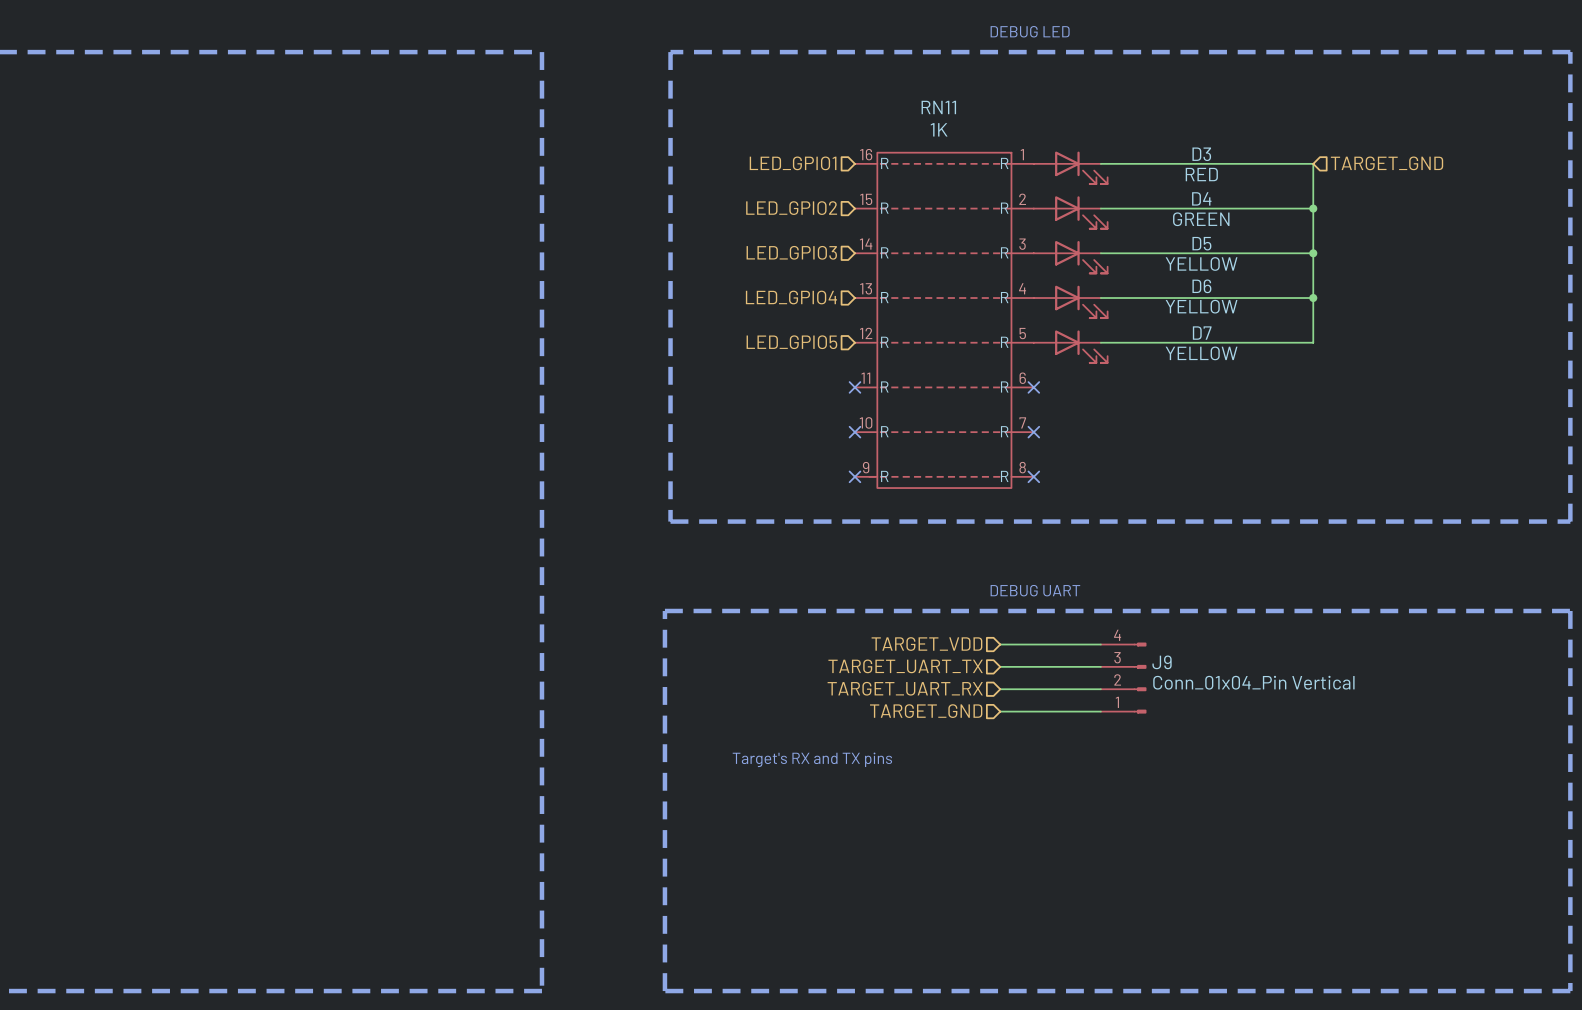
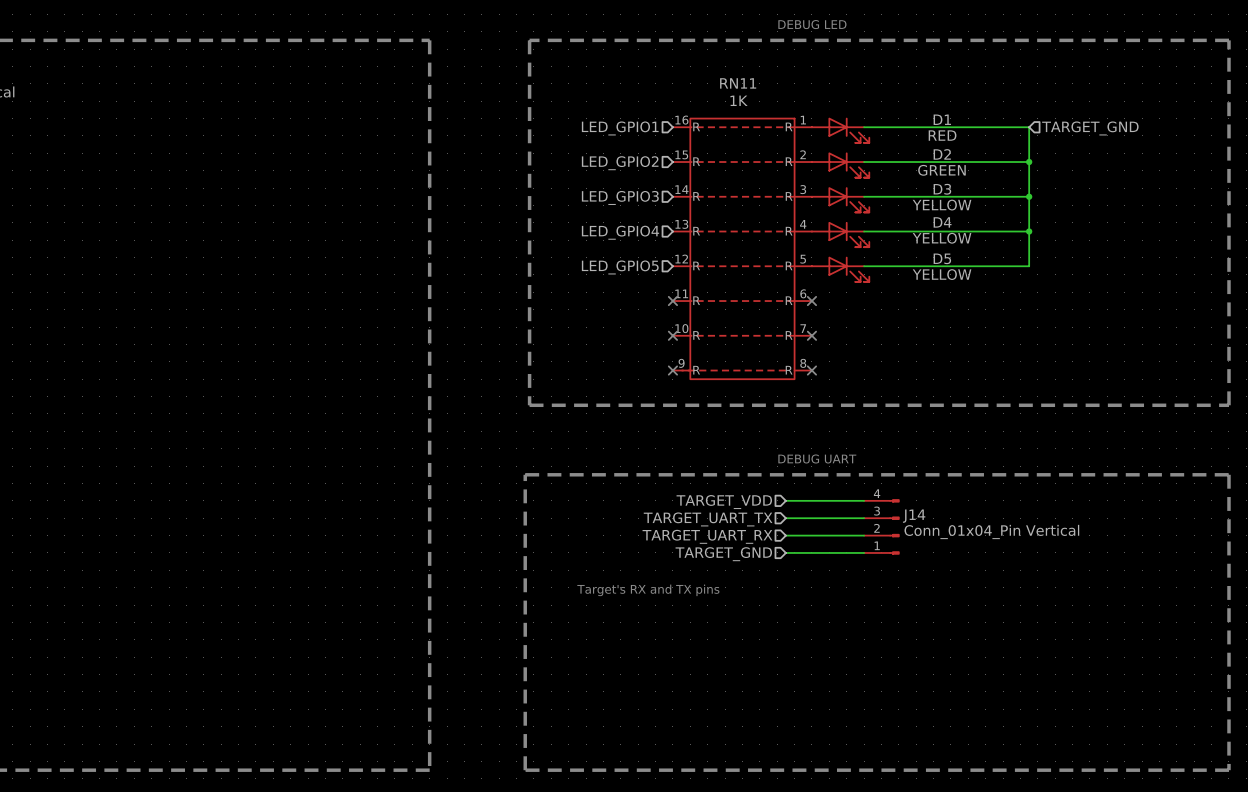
D3 name: D3 (1201, 154) -> D1 (942, 119)
D4 name: D4 (1201, 198) -> D2 (942, 154)
D5 name: D5 (1201, 243) -> D3 (942, 189)
D6 name: D6 (1201, 286) -> D4 (942, 222)
D7 name: D7 (1202, 333) -> D5 (942, 258)
J9 name: J9 (1162, 662) -> J14 (914, 516)

